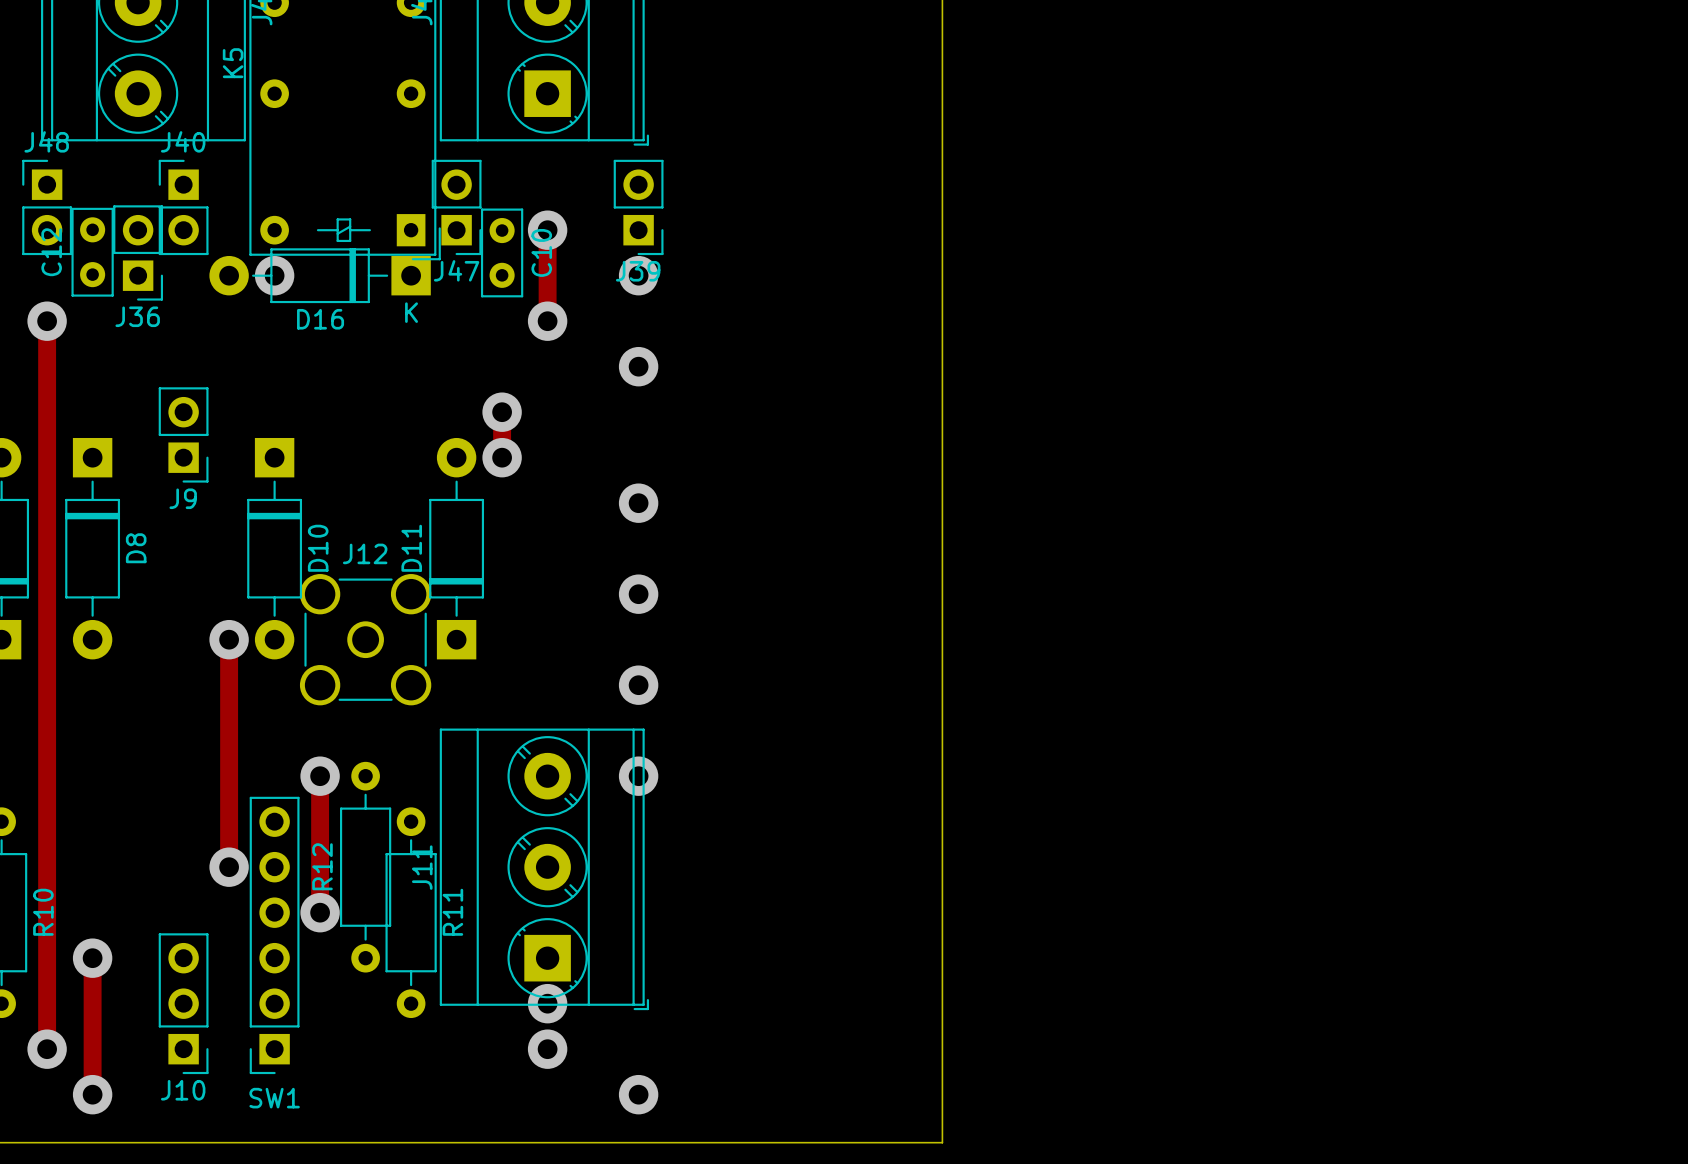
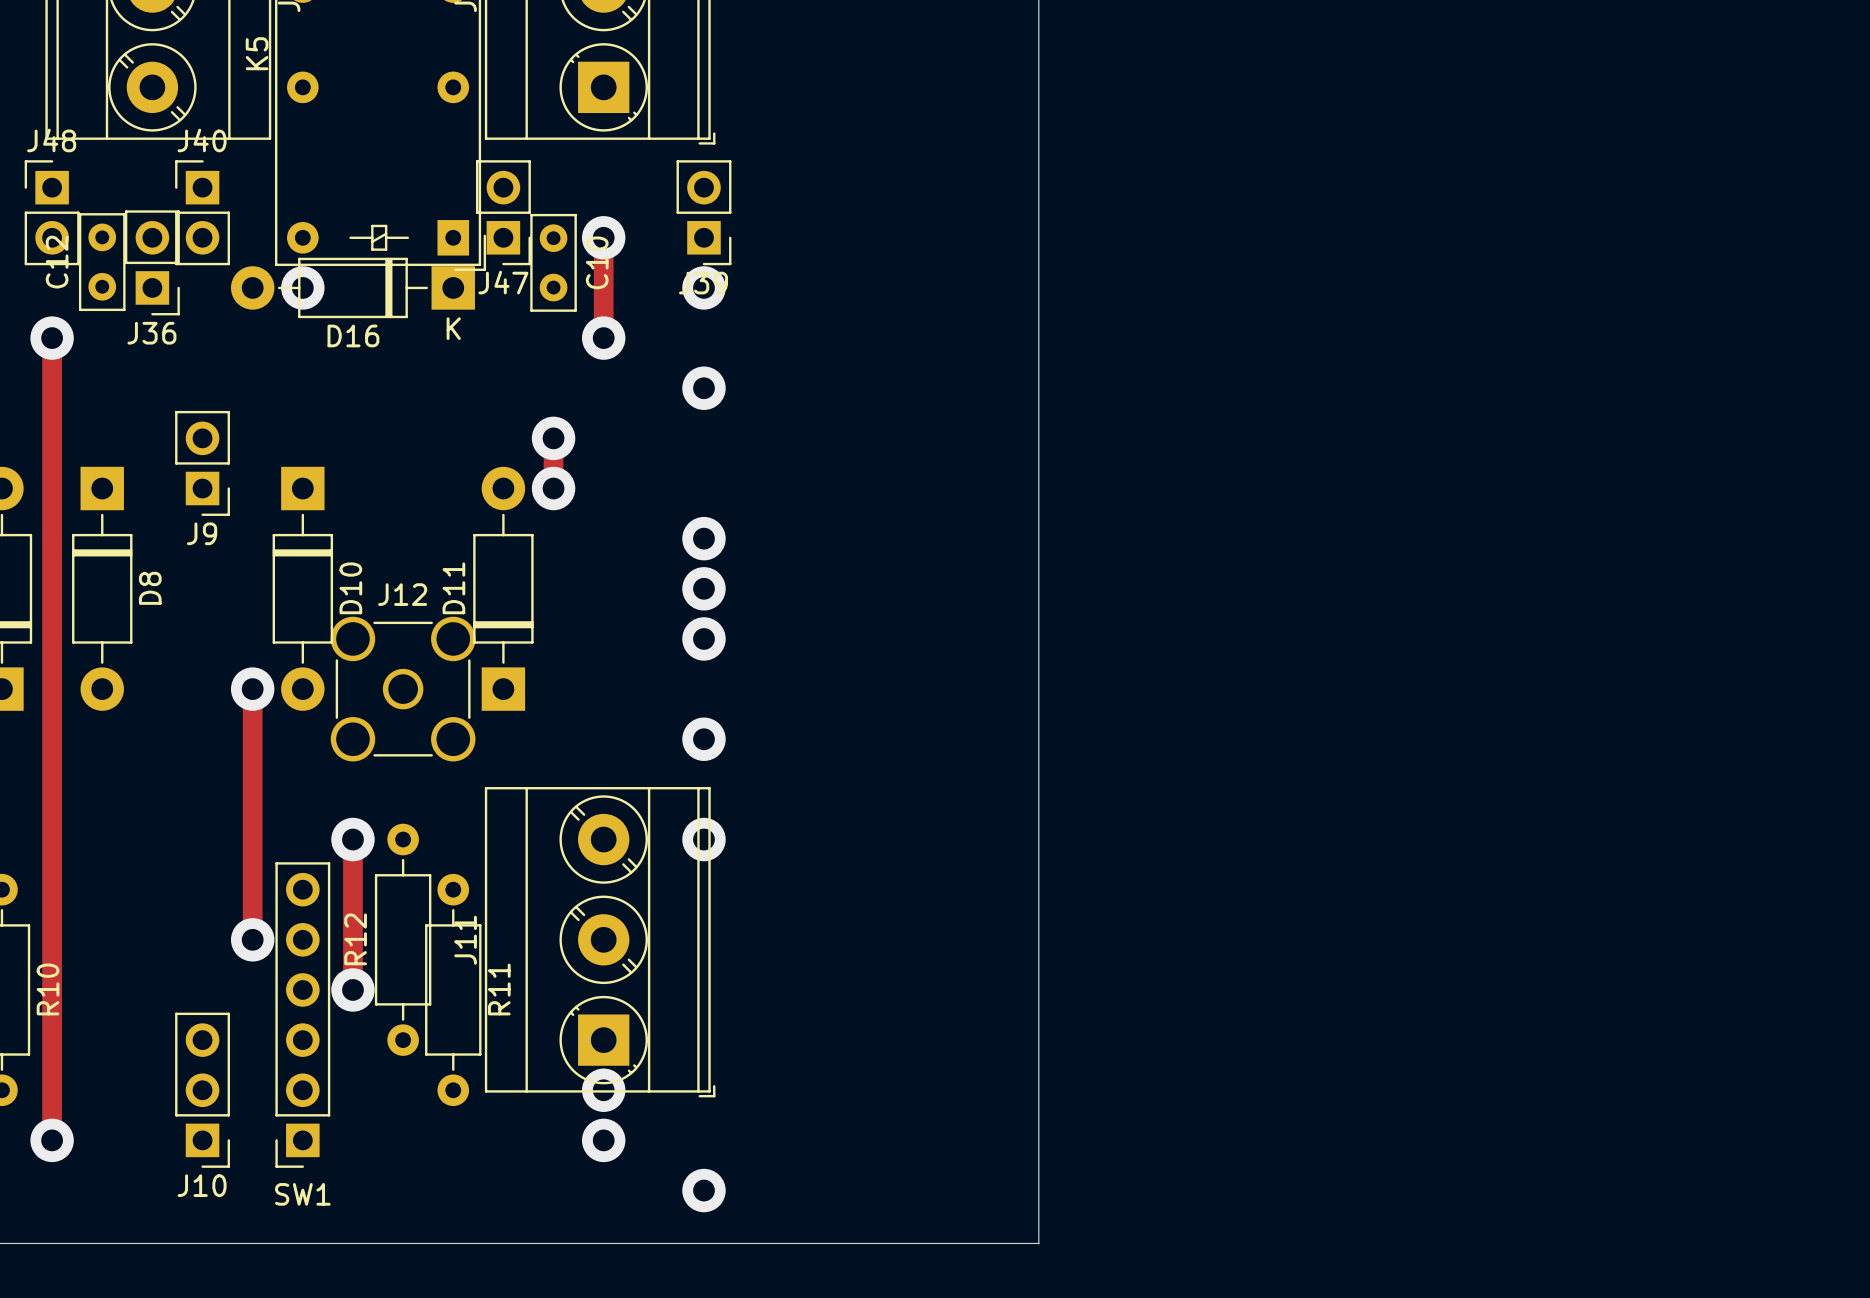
via: none -> (703, 588)
track: (92, 958) (92, 1094) -> none
via: (92, 958) -> none
via: (92, 1094) -> none

